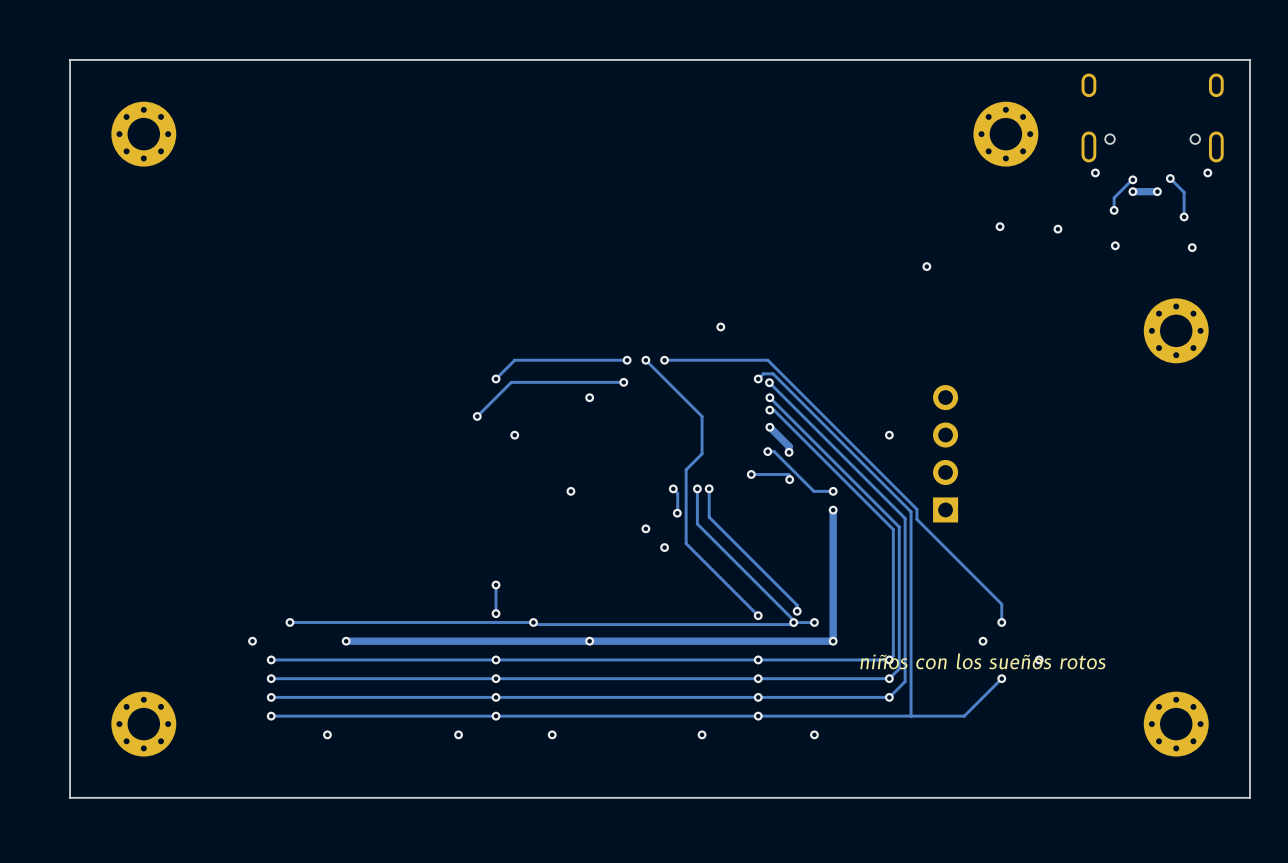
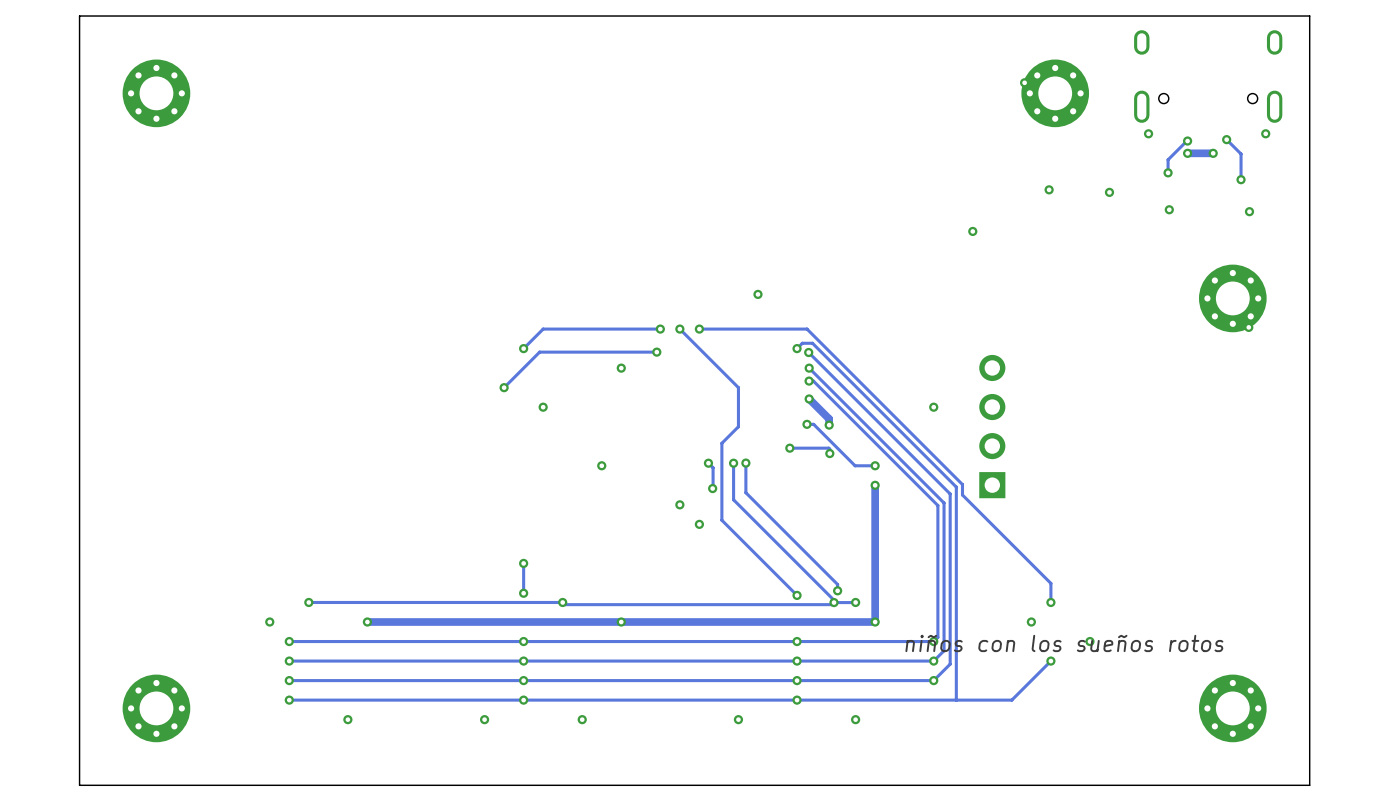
via: none -> (1024, 82)
via: none -> (1248, 327)

